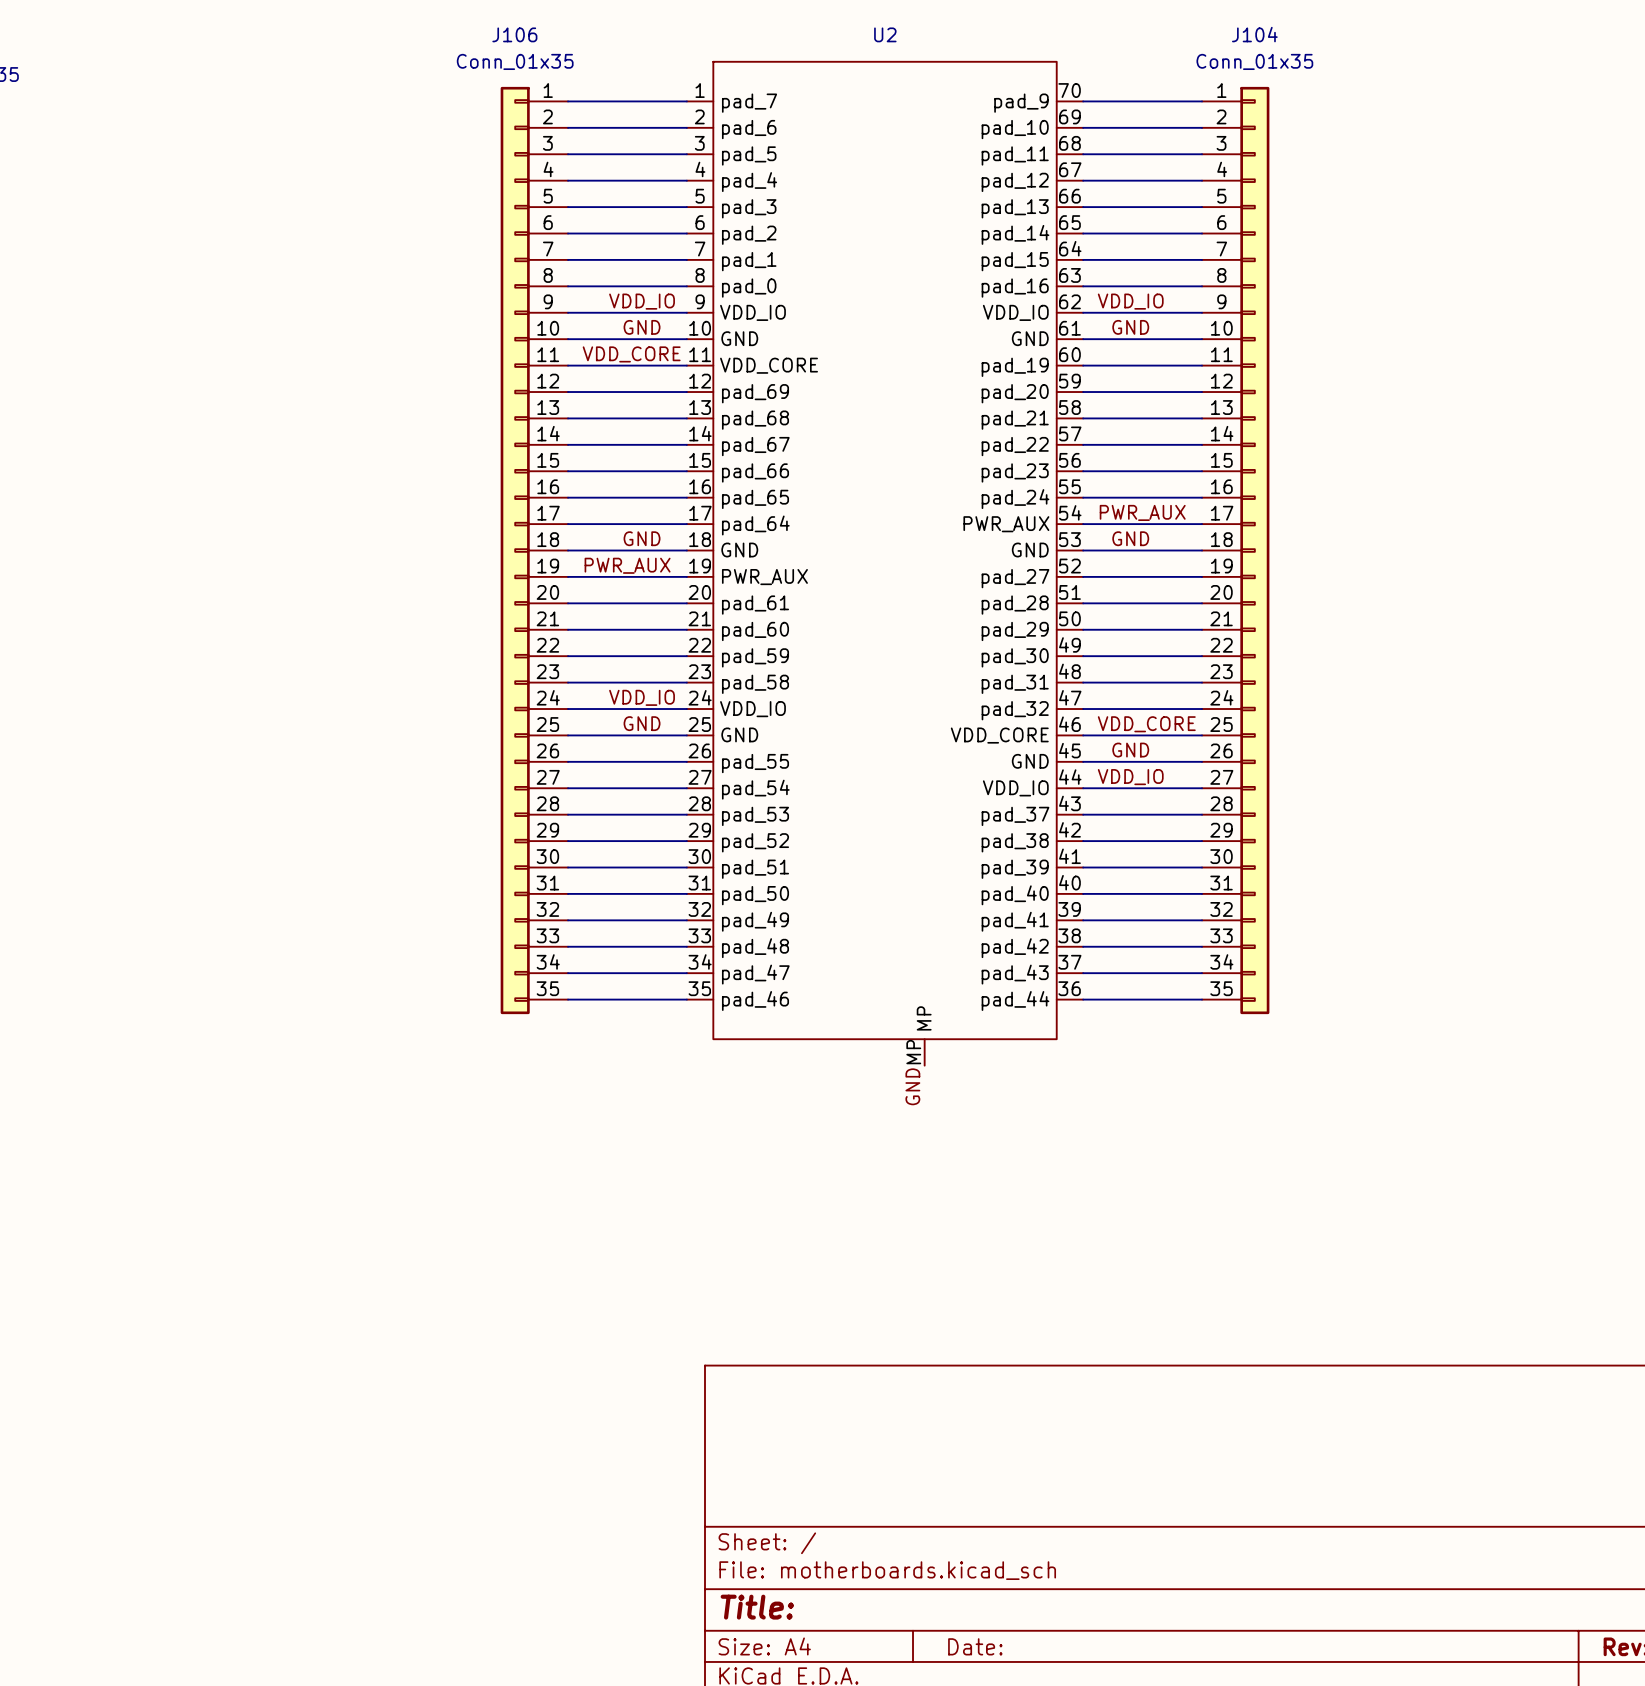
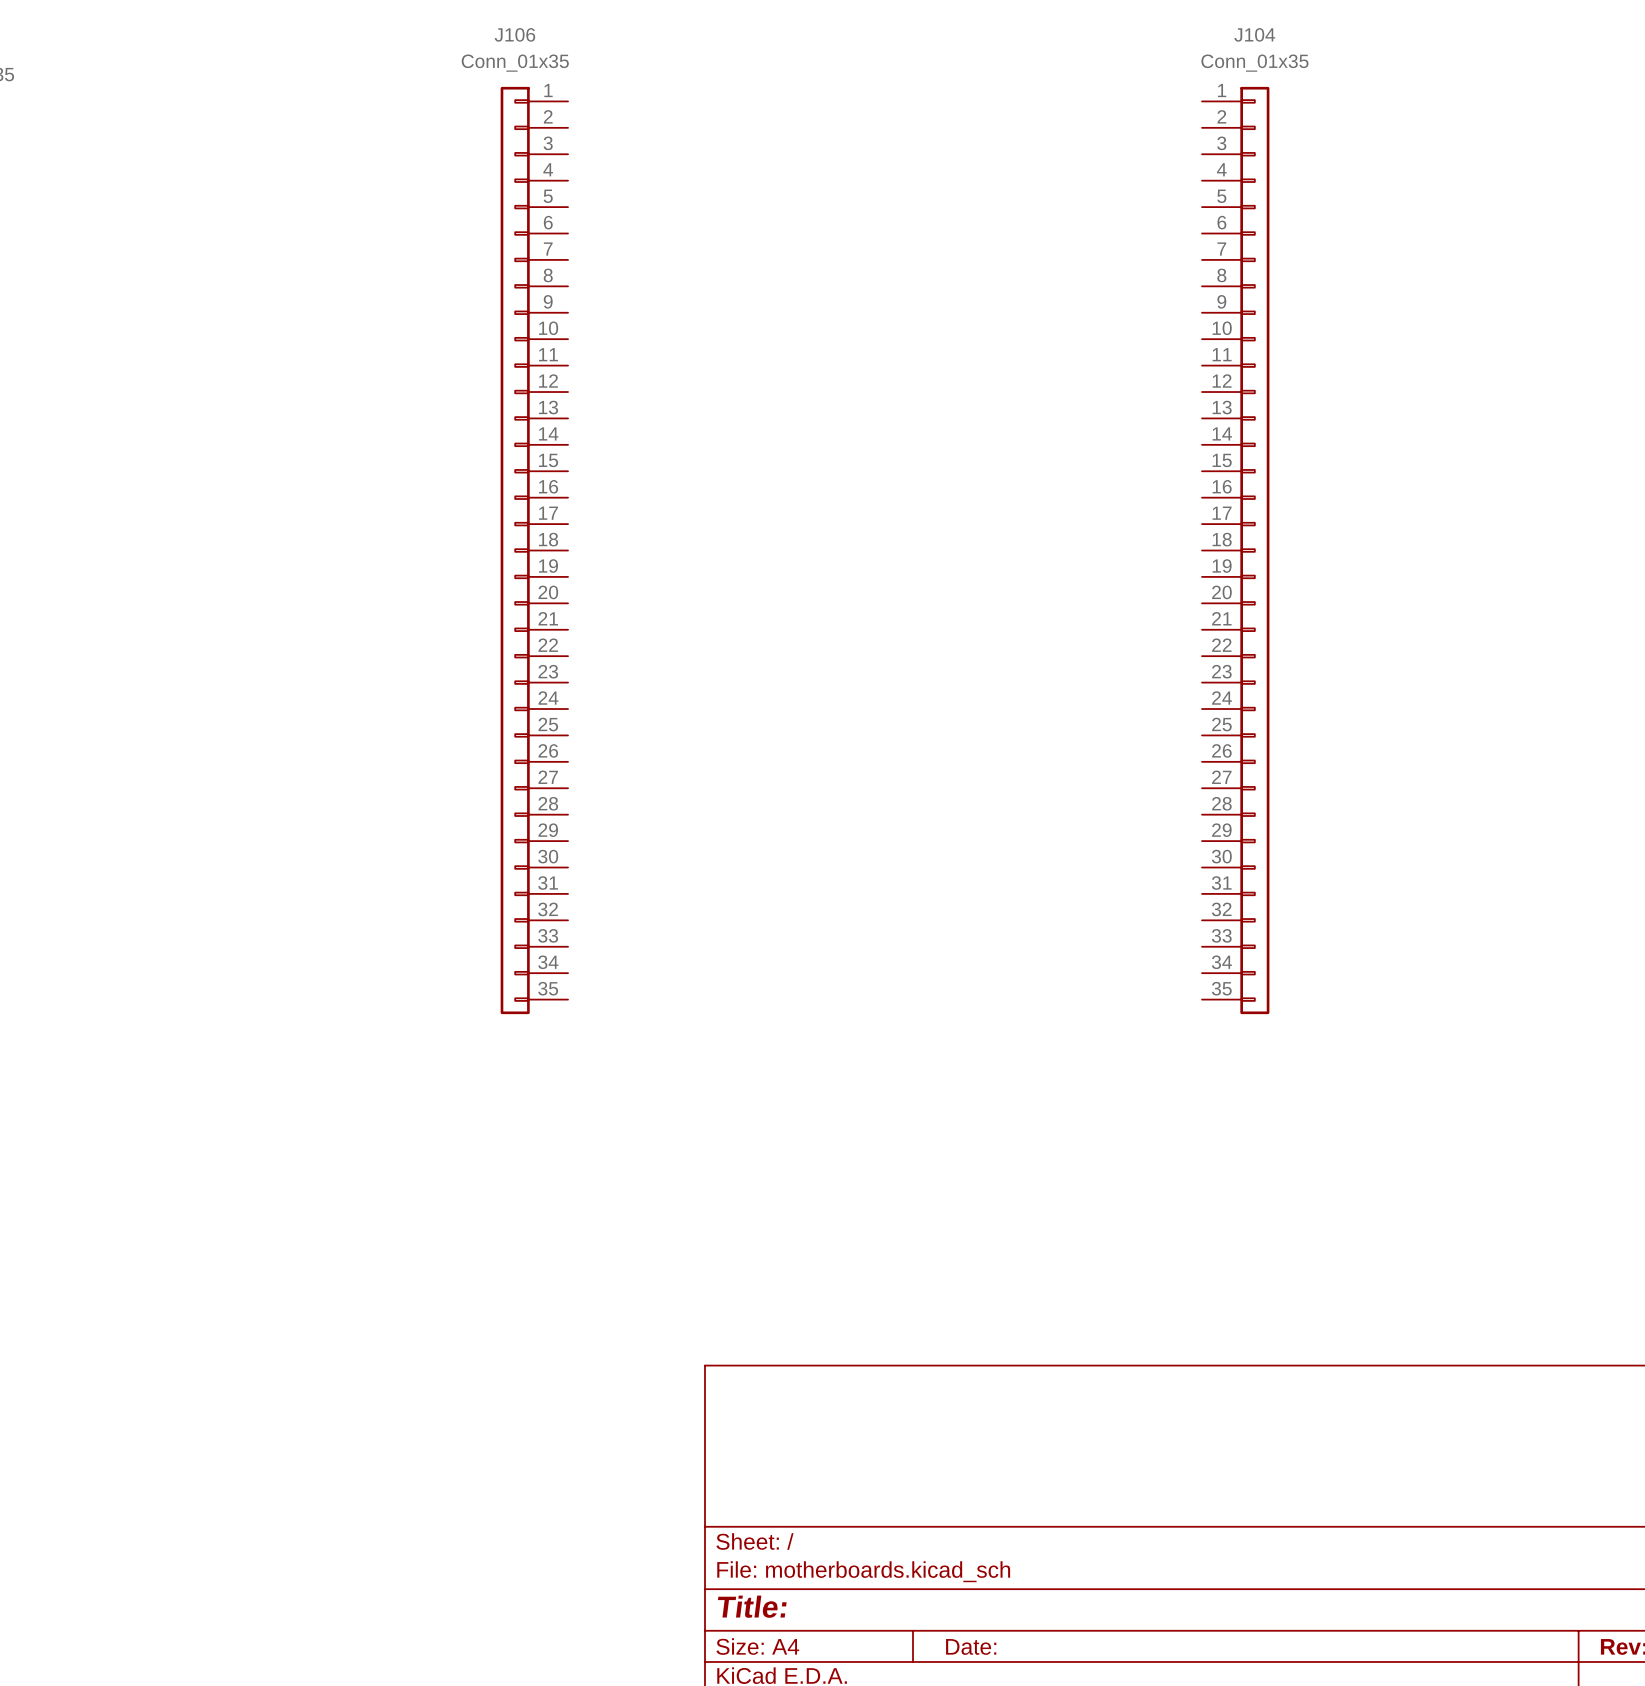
wire: (568, 101) (686, 101) -> none
wire: (1083, 101) (1202, 101) -> none
wire: (568, 127) (686, 127) -> none
wire: (1083, 127) (1202, 127) -> none
wire: (568, 154) (686, 154) -> none
wire: (1083, 154) (1202, 154) -> none
wire: (568, 180) (686, 180) -> none
wire: (1083, 180) (1202, 180) -> none
wire: (568, 207) (686, 207) -> none
wire: (1083, 207) (1202, 207) -> none
wire: (568, 233) (686, 233) -> none
wire: (1083, 233) (1202, 233) -> none
wire: (568, 259) (686, 259) -> none
wire: (1083, 259) (1202, 259) -> none
wire: (568, 286) (686, 286) -> none
wire: (1083, 286) (1202, 286) -> none
label: VDD_IO (642, 301) -> none
label: VDD_IO (1130, 301) -> none
wire: (568, 312) (686, 312) -> none
wire: (1083, 312) (1202, 312) -> none
label: GND (642, 327) -> none
label: GND (1130, 327) -> none
wire: (568, 339) (686, 339) -> none
wire: (1083, 339) (1202, 339) -> none
label: VDD_CORE (631, 354) -> none
wire: (568, 365) (686, 365) -> none
wire: (1083, 365) (1202, 365) -> none
wire: (568, 392) (686, 392) -> none
wire: (1083, 392) (1202, 392) -> none
wire: (568, 418) (686, 418) -> none
wire: (1083, 418) (1202, 418) -> none
wire: (568, 444) (686, 444) -> none
wire: (1083, 444) (1202, 444) -> none
wire: (568, 471) (686, 471) -> none
wire: (1083, 471) (1202, 471) -> none
wire: (568, 497) (686, 497) -> none
wire: (1083, 497) (1202, 497) -> none
label: PWR_AUX (1142, 512) -> none
wire: (568, 524) (686, 524) -> none
wire: (1083, 524) (1202, 524) -> none
label: GND (642, 538) -> none
label: GND (1130, 538) -> none
wire: (568, 550) (686, 550) -> none
wire: (1083, 550) (1202, 550) -> none
U2: (885, 563) -> none
label: PWR_AUX (627, 565) -> none
wire: (568, 576) (686, 576) -> none
wire: (1083, 576) (1202, 576) -> none
wire: (568, 603) (686, 603) -> none
wire: (1083, 603) (1202, 603) -> none
wire: (568, 629) (686, 629) -> none
wire: (1083, 629) (1202, 629) -> none
wire: (568, 656) (686, 656) -> none
wire: (1083, 656) (1202, 656) -> none
wire: (568, 682) (686, 682) -> none
wire: (1083, 682) (1202, 682) -> none
label: VDD_IO (642, 697) -> none
wire: (568, 709) (686, 709) -> none
wire: (1083, 709) (1202, 709) -> none
label: GND (642, 723) -> none
label: VDD_CORE (1146, 724) -> none
wire: (568, 735) (686, 735) -> none
wire: (1083, 735) (1202, 735) -> none
label: GND (1130, 750) -> none
wire: (568, 761) (686, 761) -> none
wire: (1083, 761) (1202, 761) -> none
label: VDD_IO (1130, 777) -> none
wire: (568, 788) (686, 788) -> none
wire: (1083, 788) (1202, 788) -> none
wire: (568, 814) (686, 814) -> none
wire: (1083, 814) (1202, 814) -> none
wire: (568, 841) (686, 841) -> none
wire: (1083, 841) (1202, 841) -> none
wire: (568, 867) (686, 867) -> none
wire: (1083, 867) (1202, 867) -> none
wire: (568, 893) (686, 893) -> none
wire: (1083, 893) (1202, 893) -> none
wire: (568, 920) (686, 920) -> none
wire: (1083, 920) (1202, 920) -> none
wire: (568, 946) (686, 946) -> none
wire: (1083, 946) (1202, 946) -> none
wire: (568, 973) (686, 973) -> none
wire: (1083, 973) (1202, 973) -> none
wire: (568, 999) (686, 999) -> none
wire: (1083, 999) (1202, 999) -> none
label: GND (912, 1086) -> none

